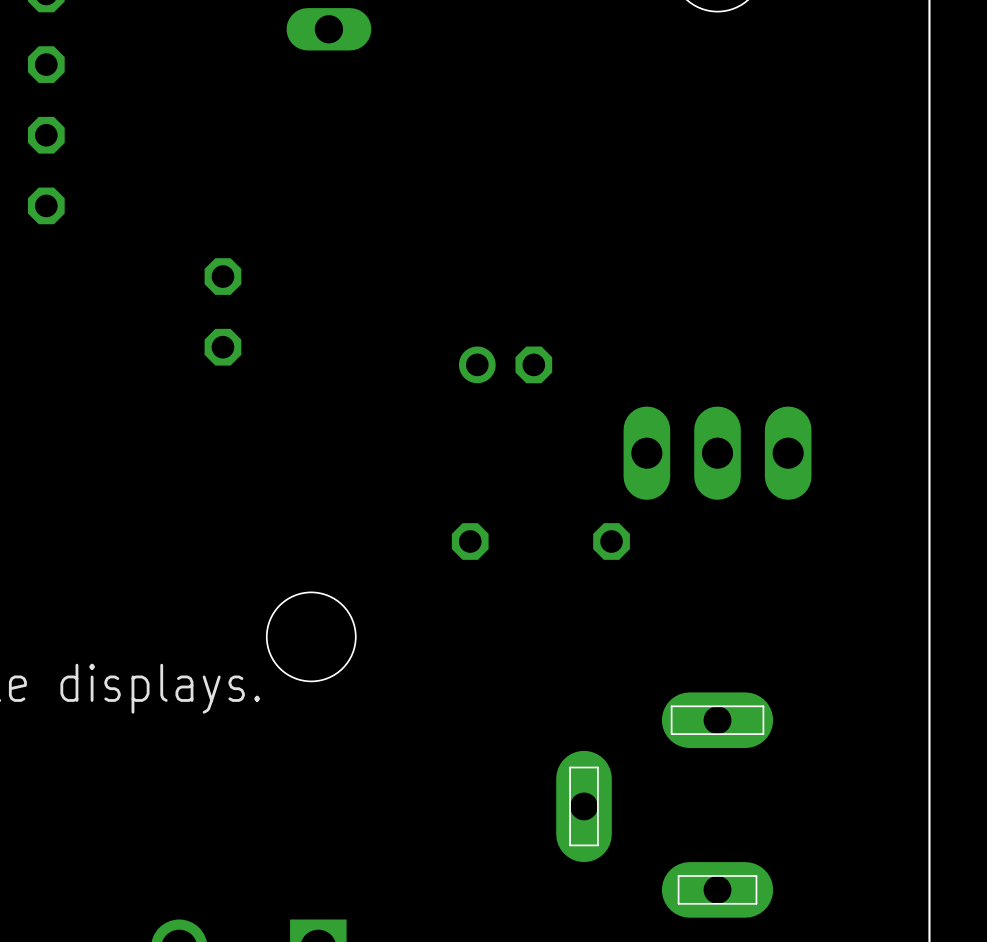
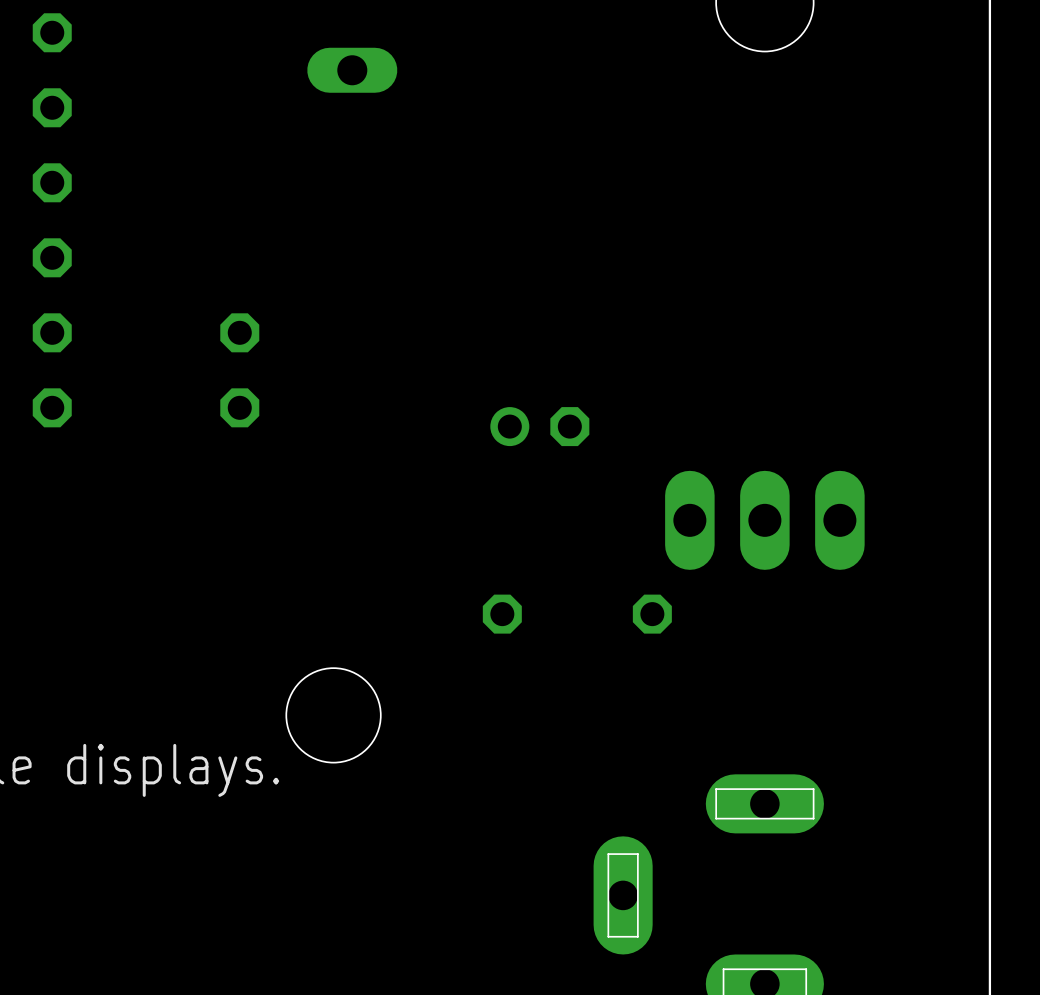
part: none -> (52, 370)

